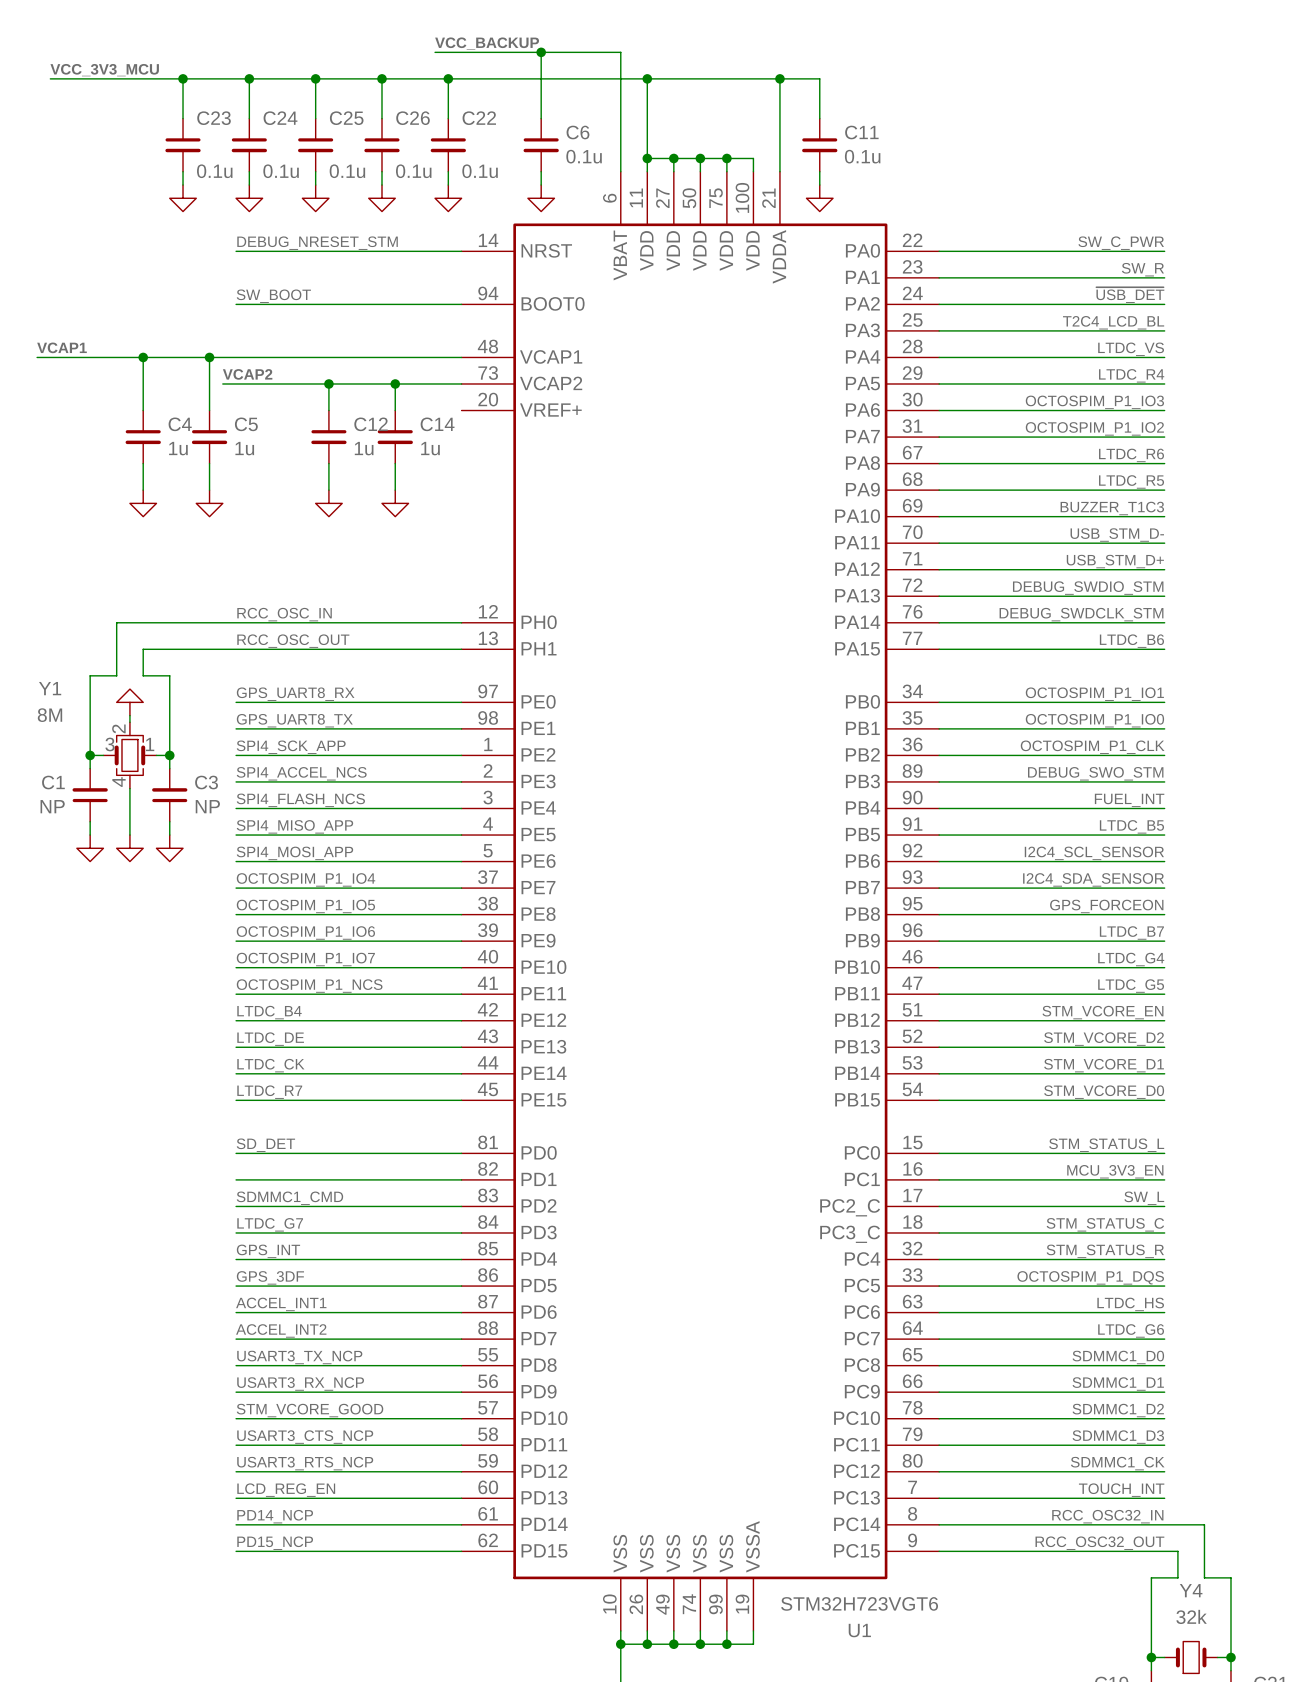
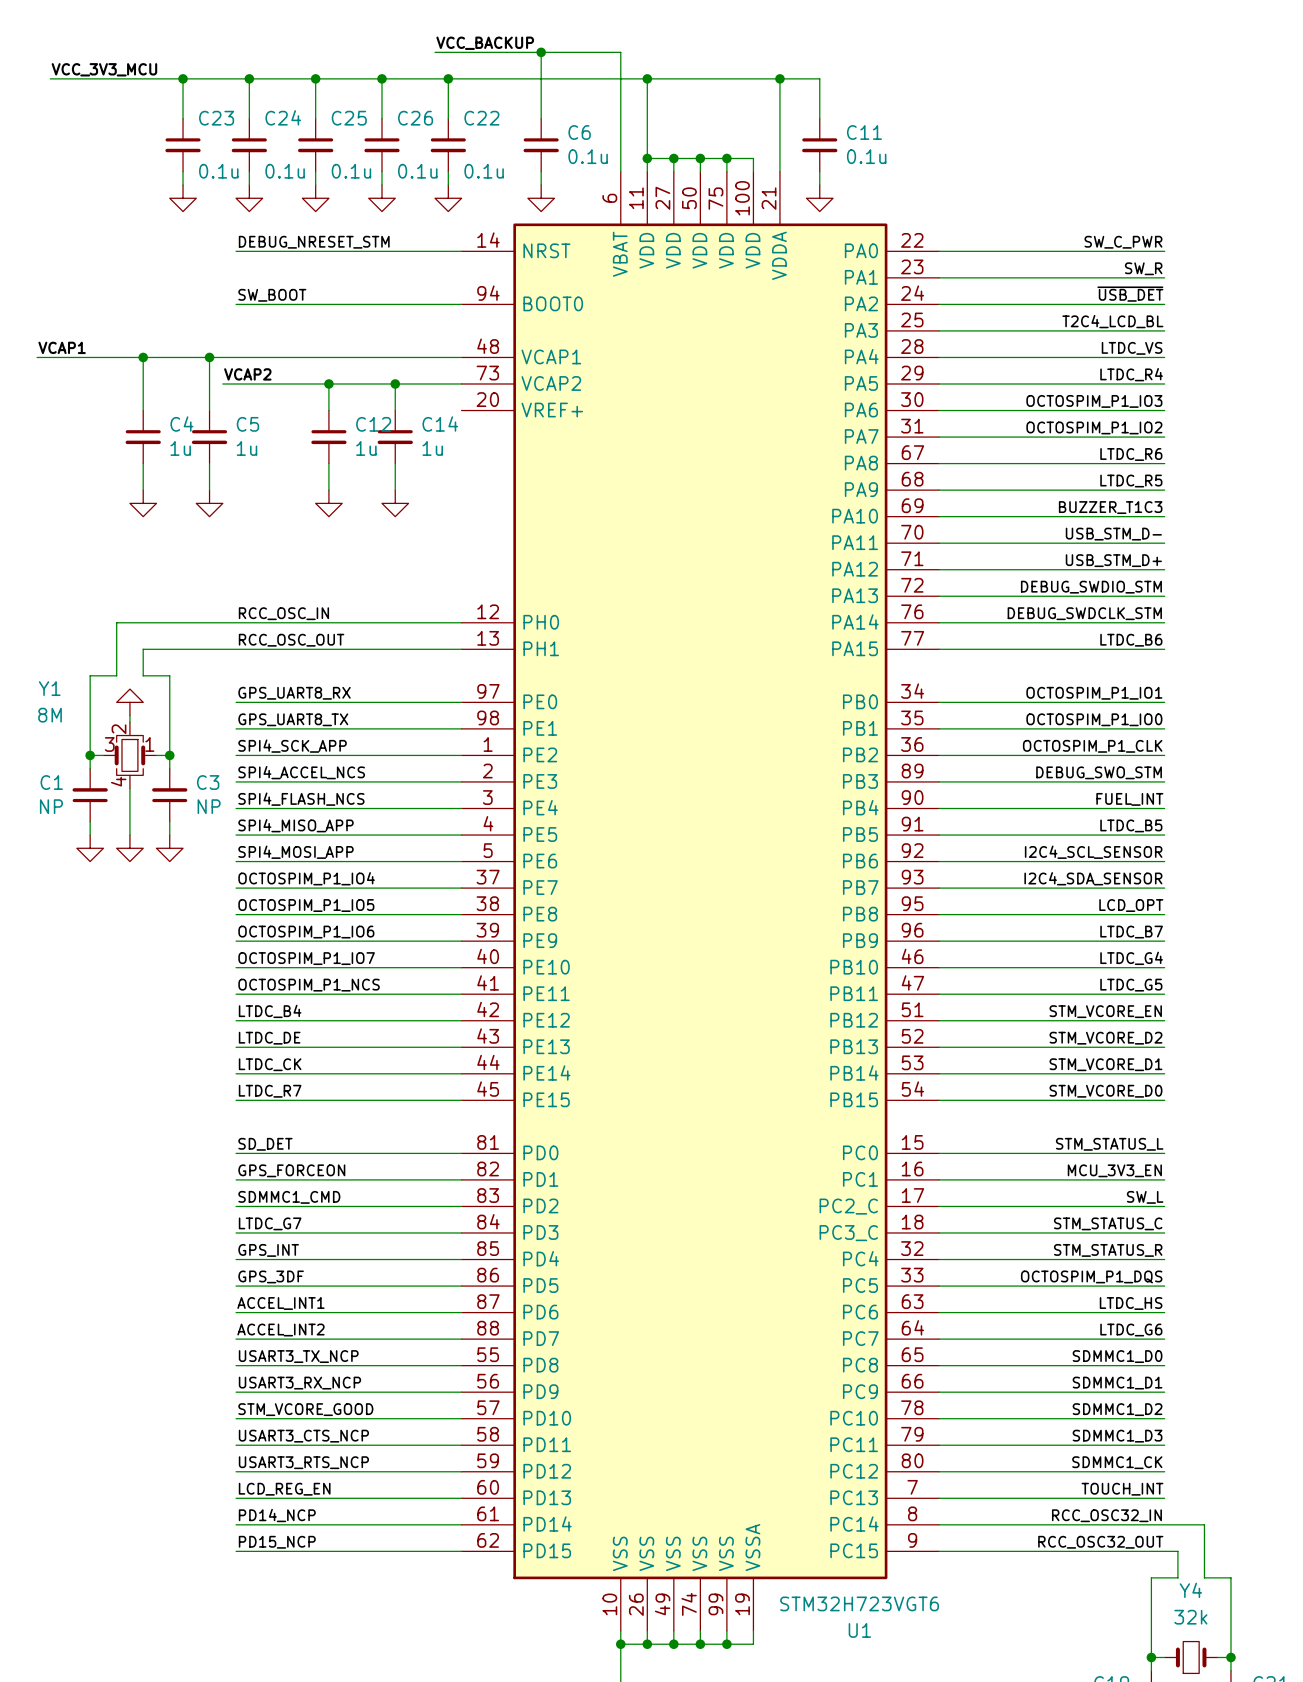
label: GPS_FORCEON (1106, 906) -> LCD_OPT (1131, 905)
label: none -> GPS_FORCEON (291, 1170)

